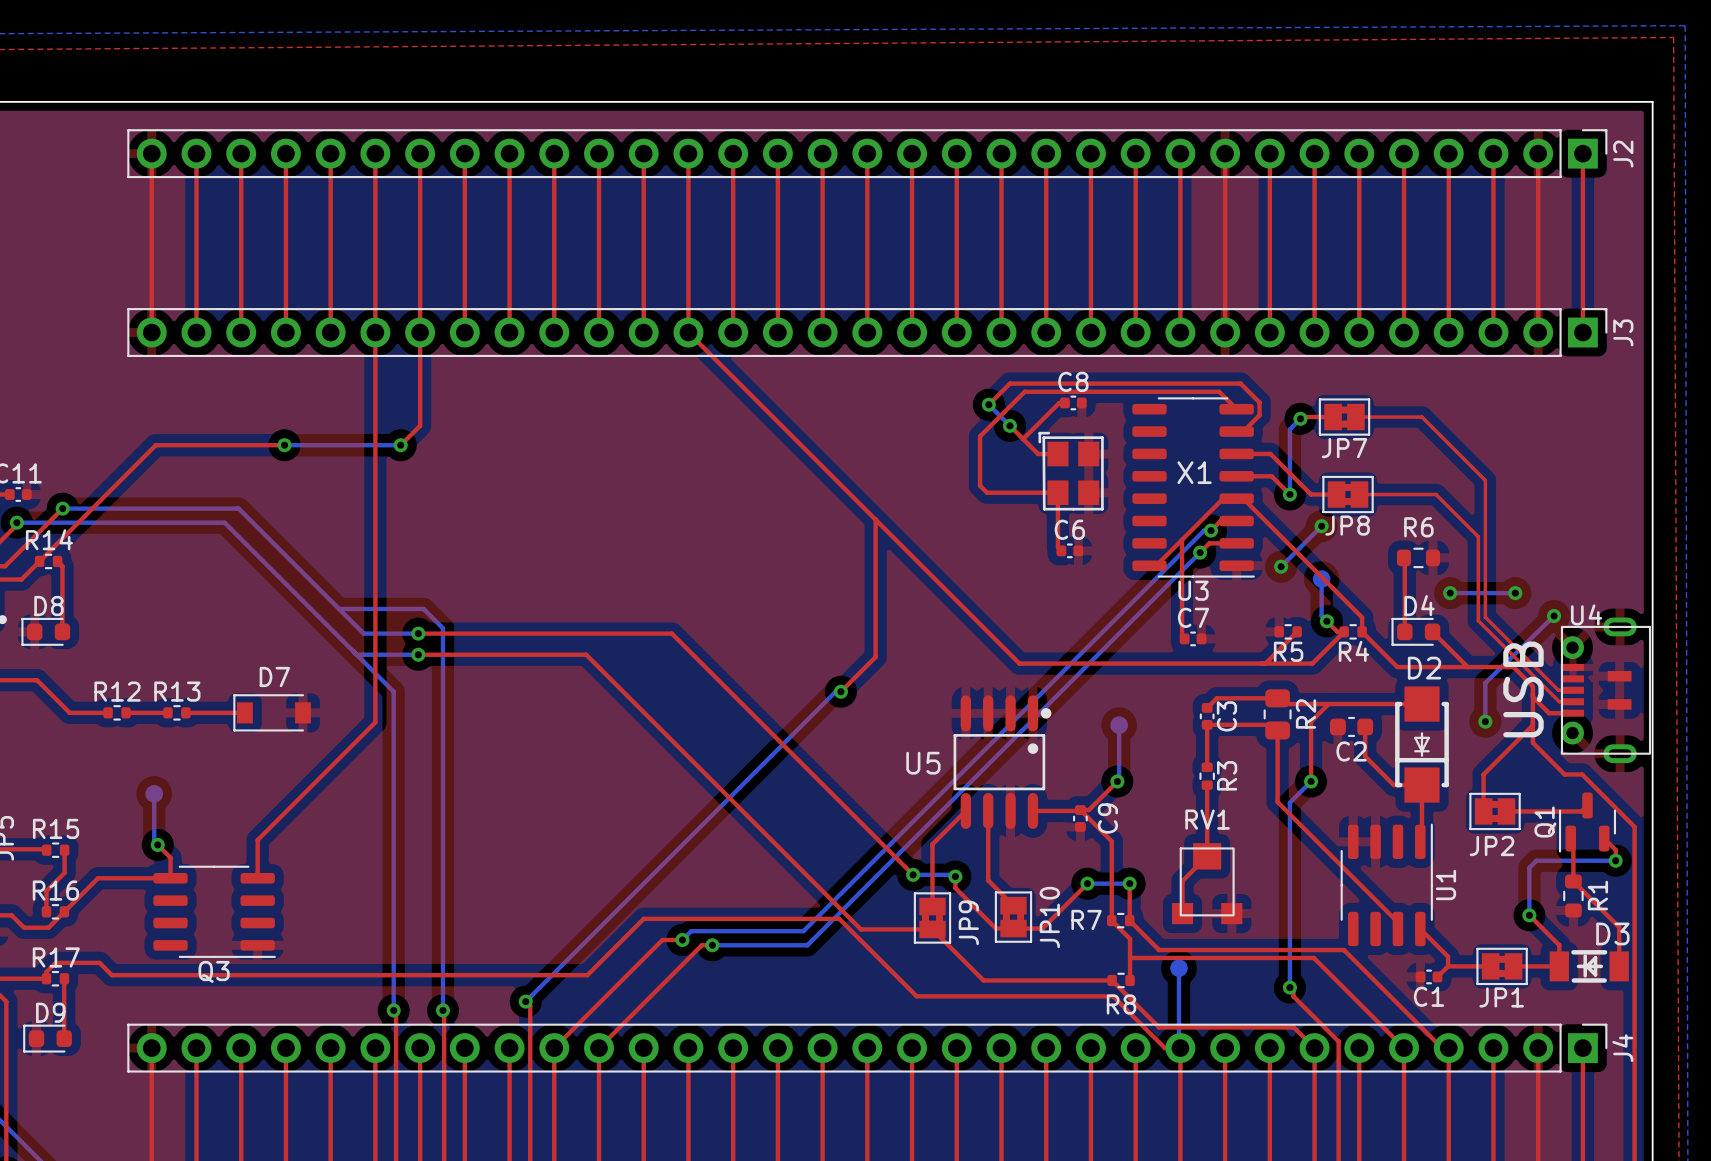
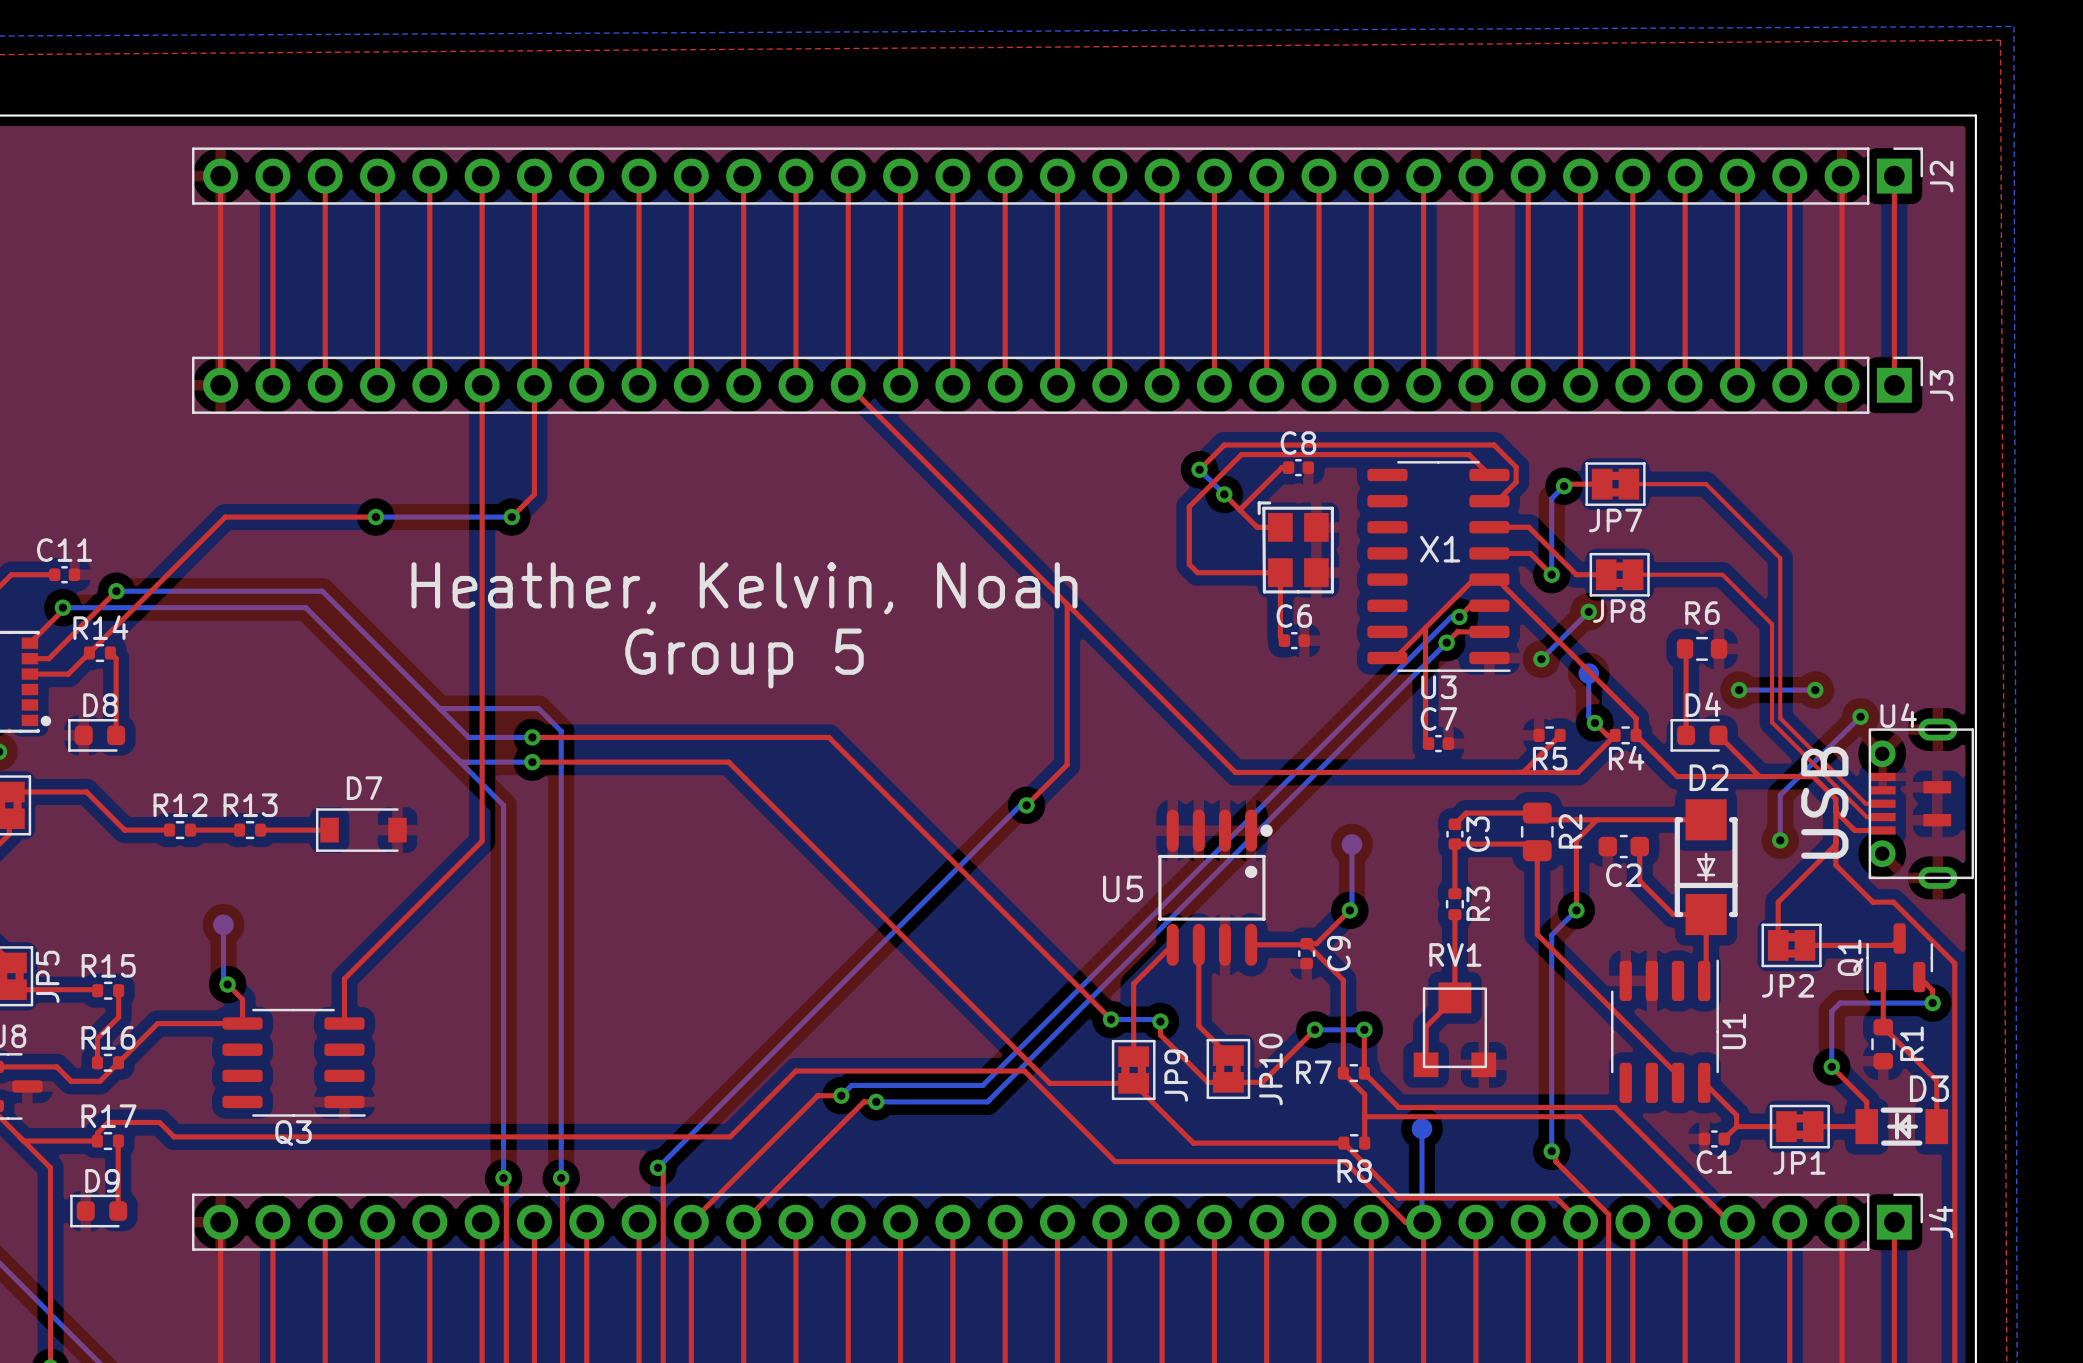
text: none -> Heather, Kelvin, Noah (744, 588)
text: none -> Group 5 (744, 658)

